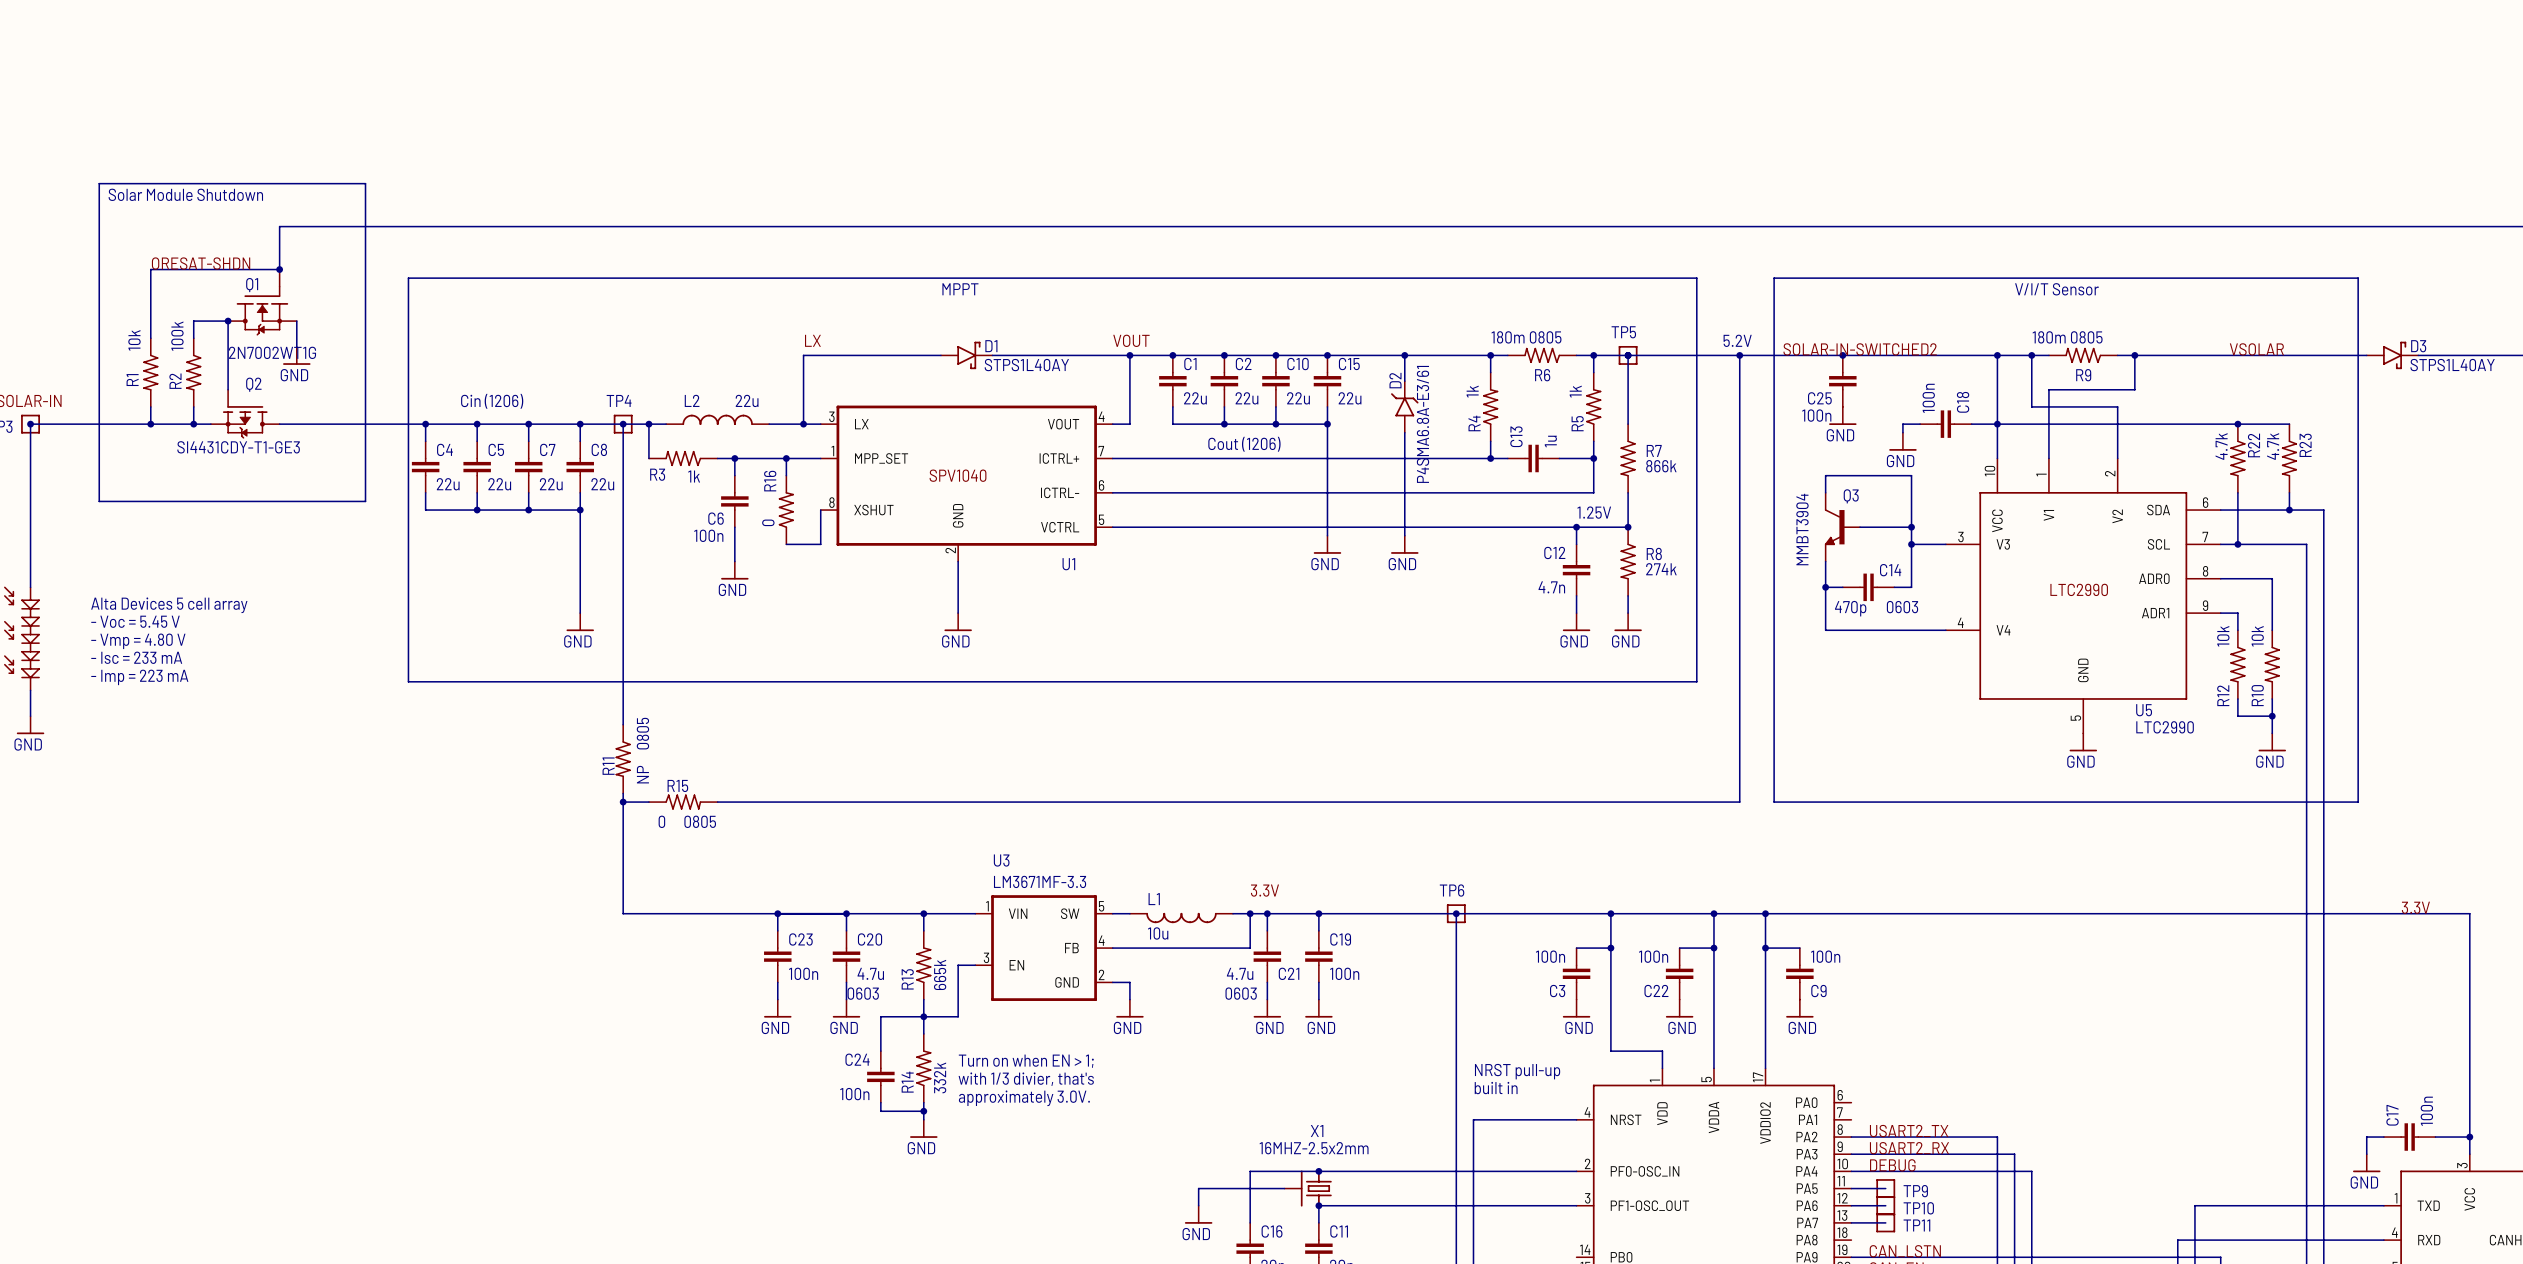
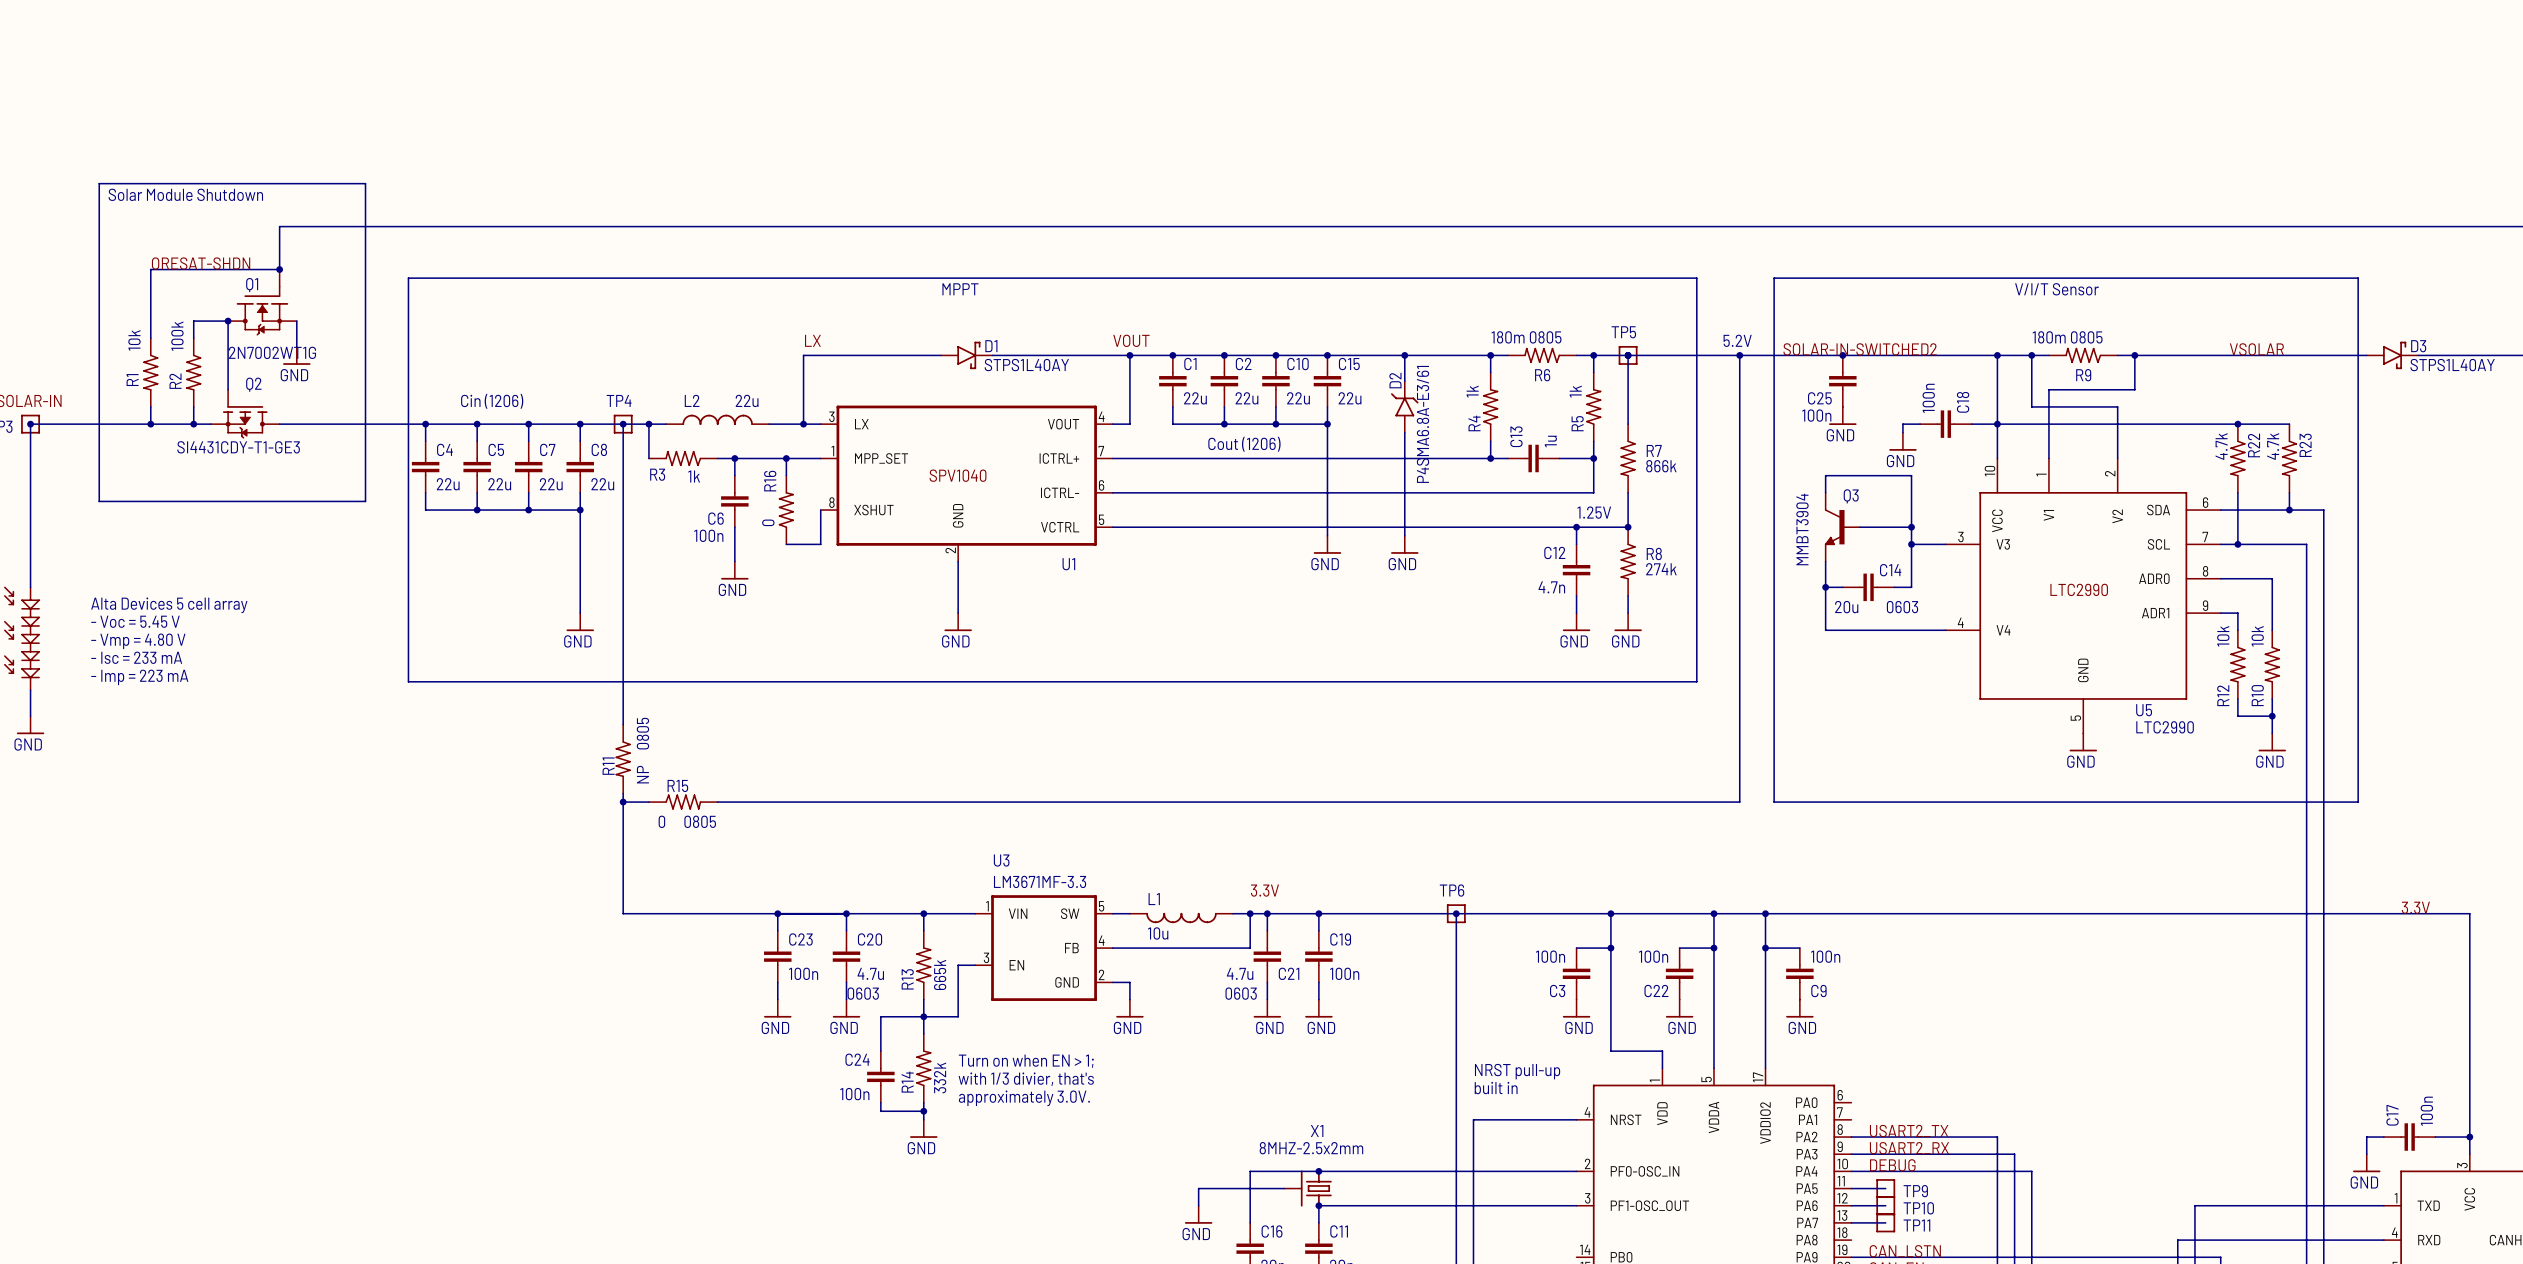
C14 value: 470p (1850, 608) -> 20u (1846, 607)
X1 value: 16MHZ-2.5x2mm (1314, 1148) -> 8MHZ-2.5x2mm (1311, 1148)

